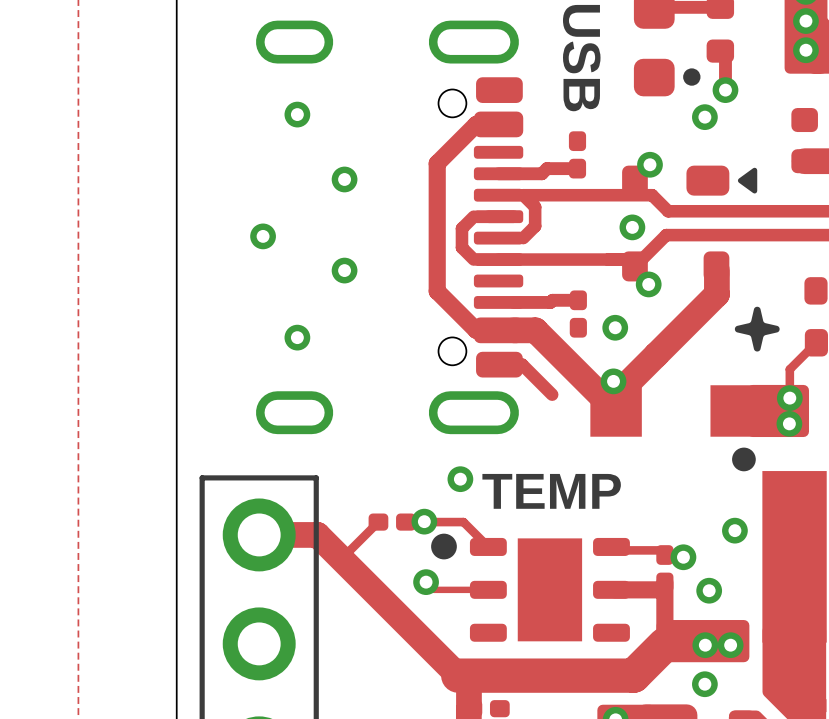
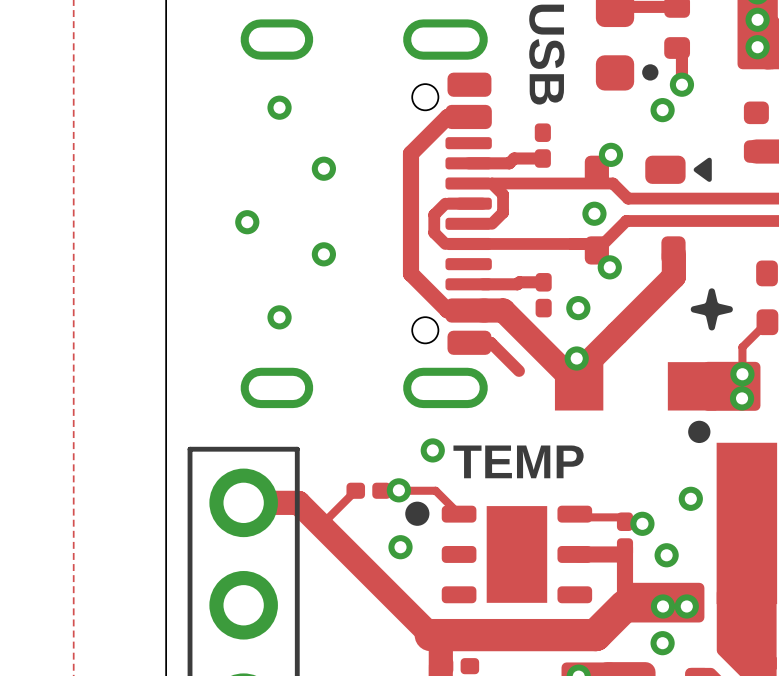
track: (426, 582) (433, 589) (488, 589) -> none

